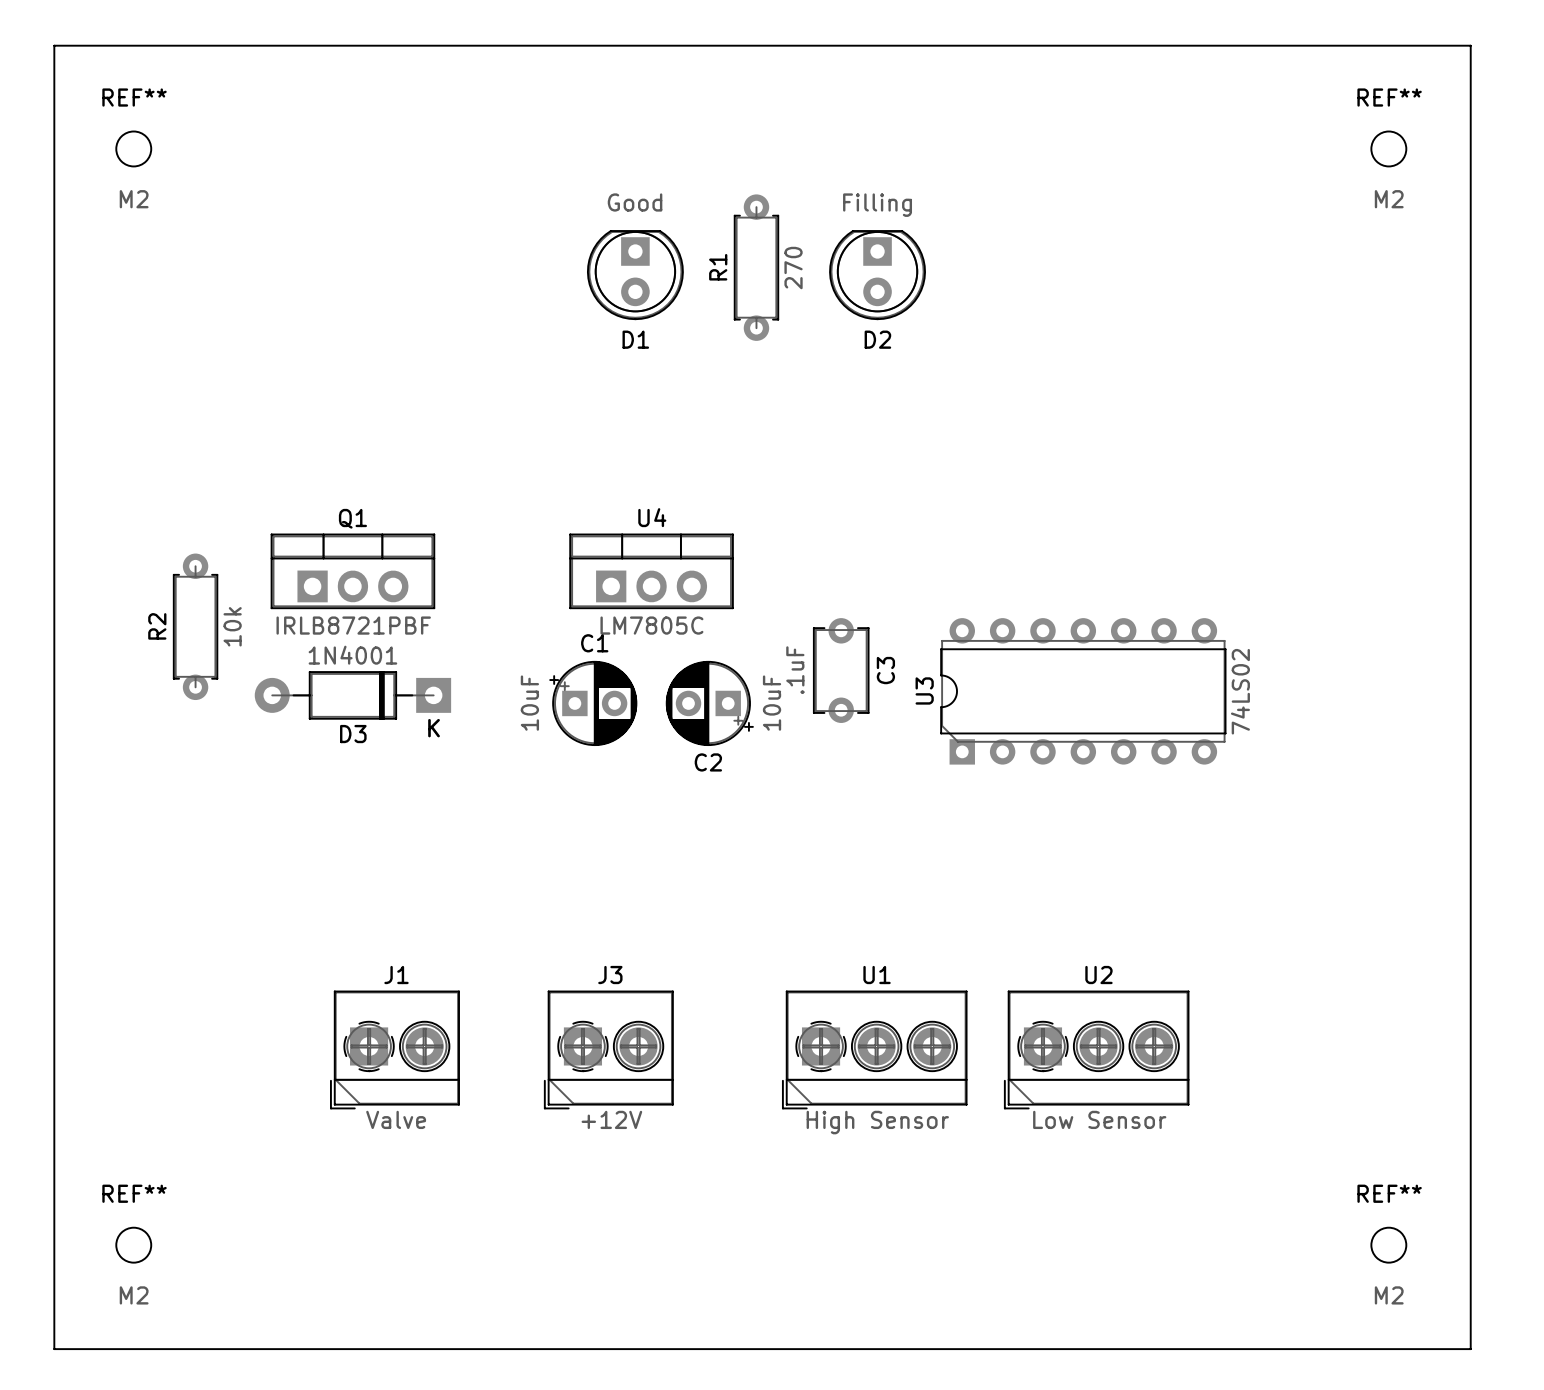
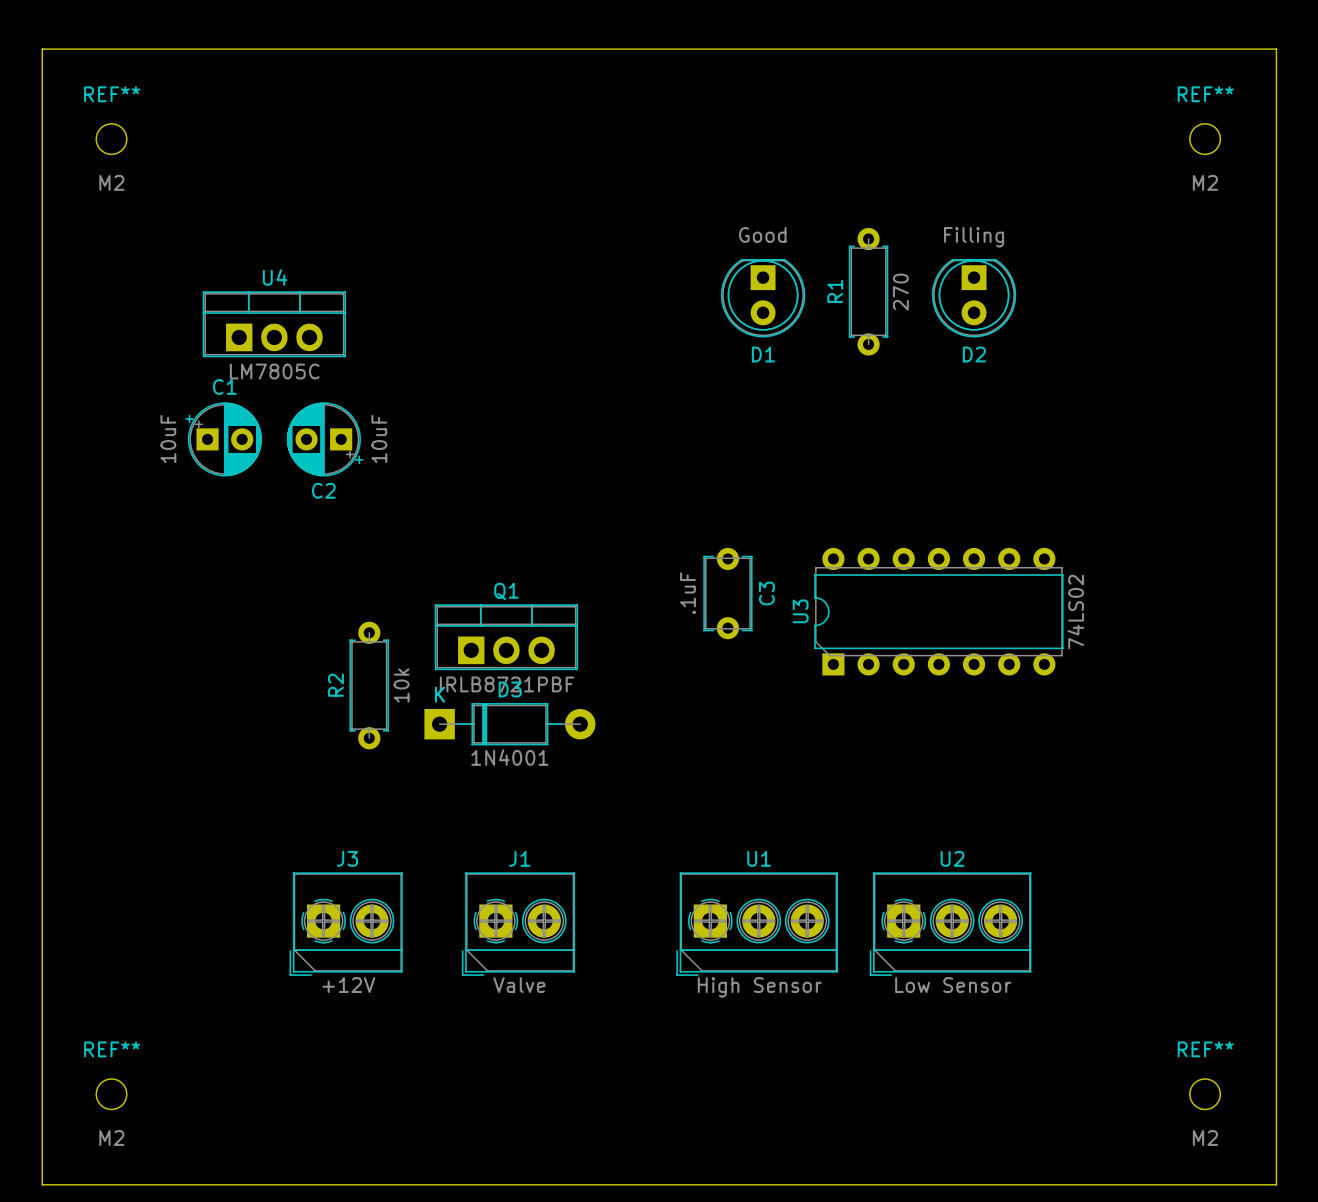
R1 position: (756, 267) -> (868, 291)
D1 position: (635, 275) -> (763, 298)
D2 position: (877, 275) -> (974, 298)
Q1 position: (352, 571) -> (506, 637)
U4 position: (651, 571) -> (274, 324)
R2 position: (195, 626) -> (369, 685)
D3 rotation: 0° (352, 695) -> 180° (509, 724)
D3 position: (352, 695) -> (509, 724)
C1 position: (593, 703) -> (223, 439)
C2 position: (709, 703) -> (325, 439)
J1 position: (394, 1049) -> (518, 924)
J3 position: (608, 1049) -> (346, 924)

